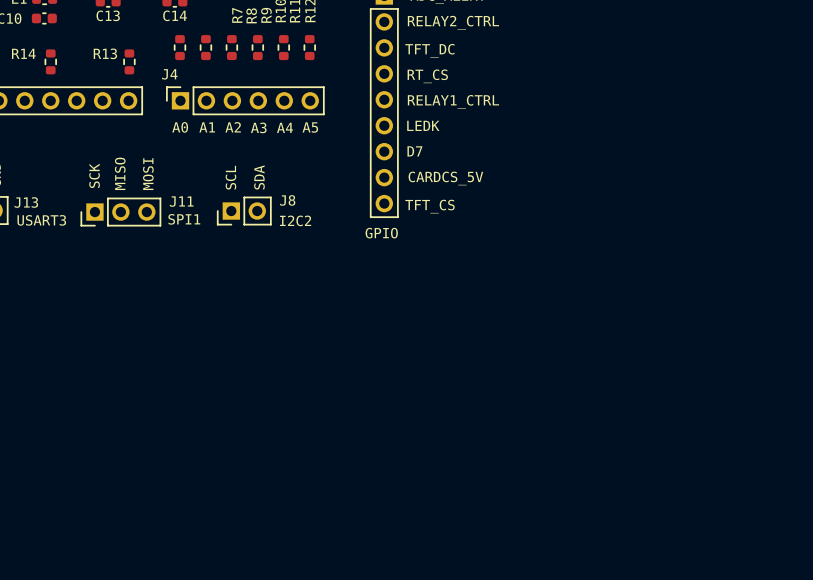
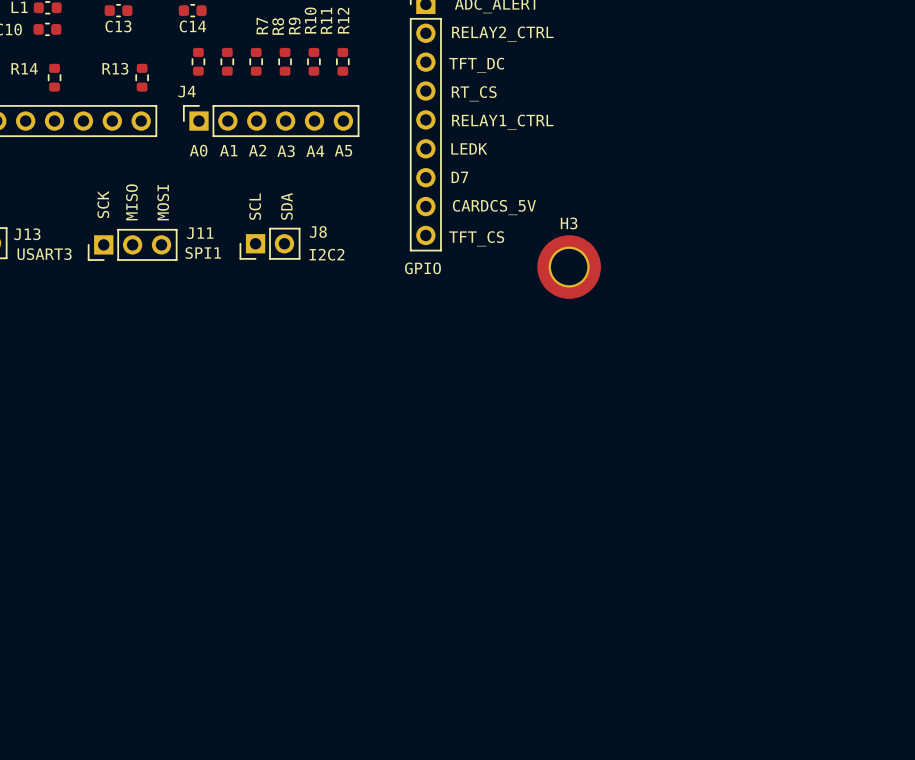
H3: none -> (569, 267)

